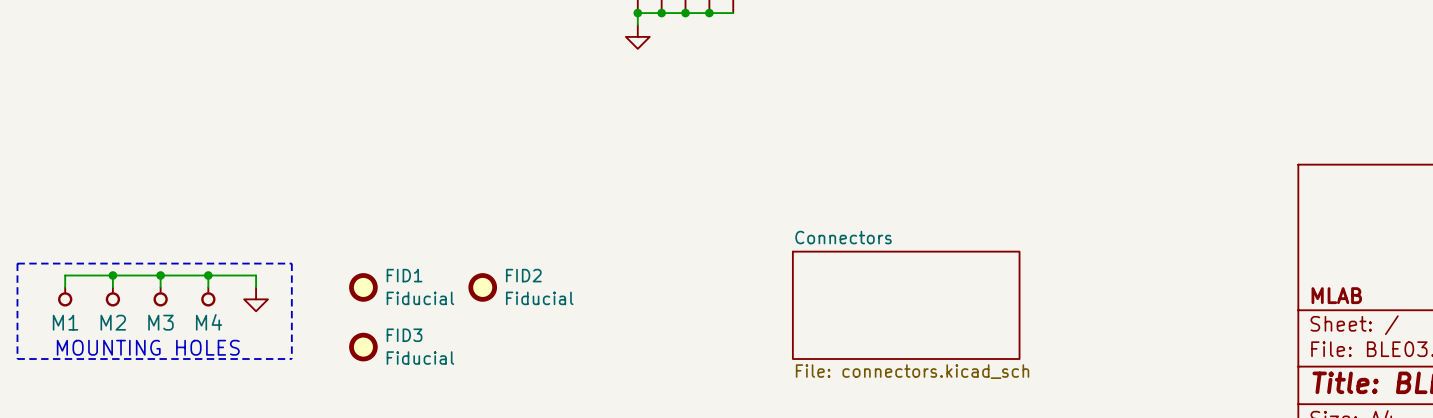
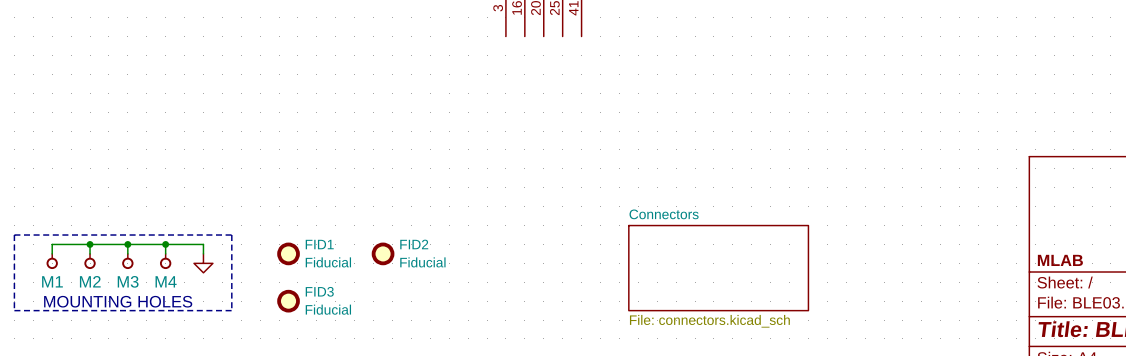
junction: (637, 13) -> none
junction: (661, 13) -> none
junction: (685, 13) -> none
junction: (709, 13) -> none
wire: (733, 13) (637, 13) (637, 24) -> none
power symbol: (637, 36) -> none

